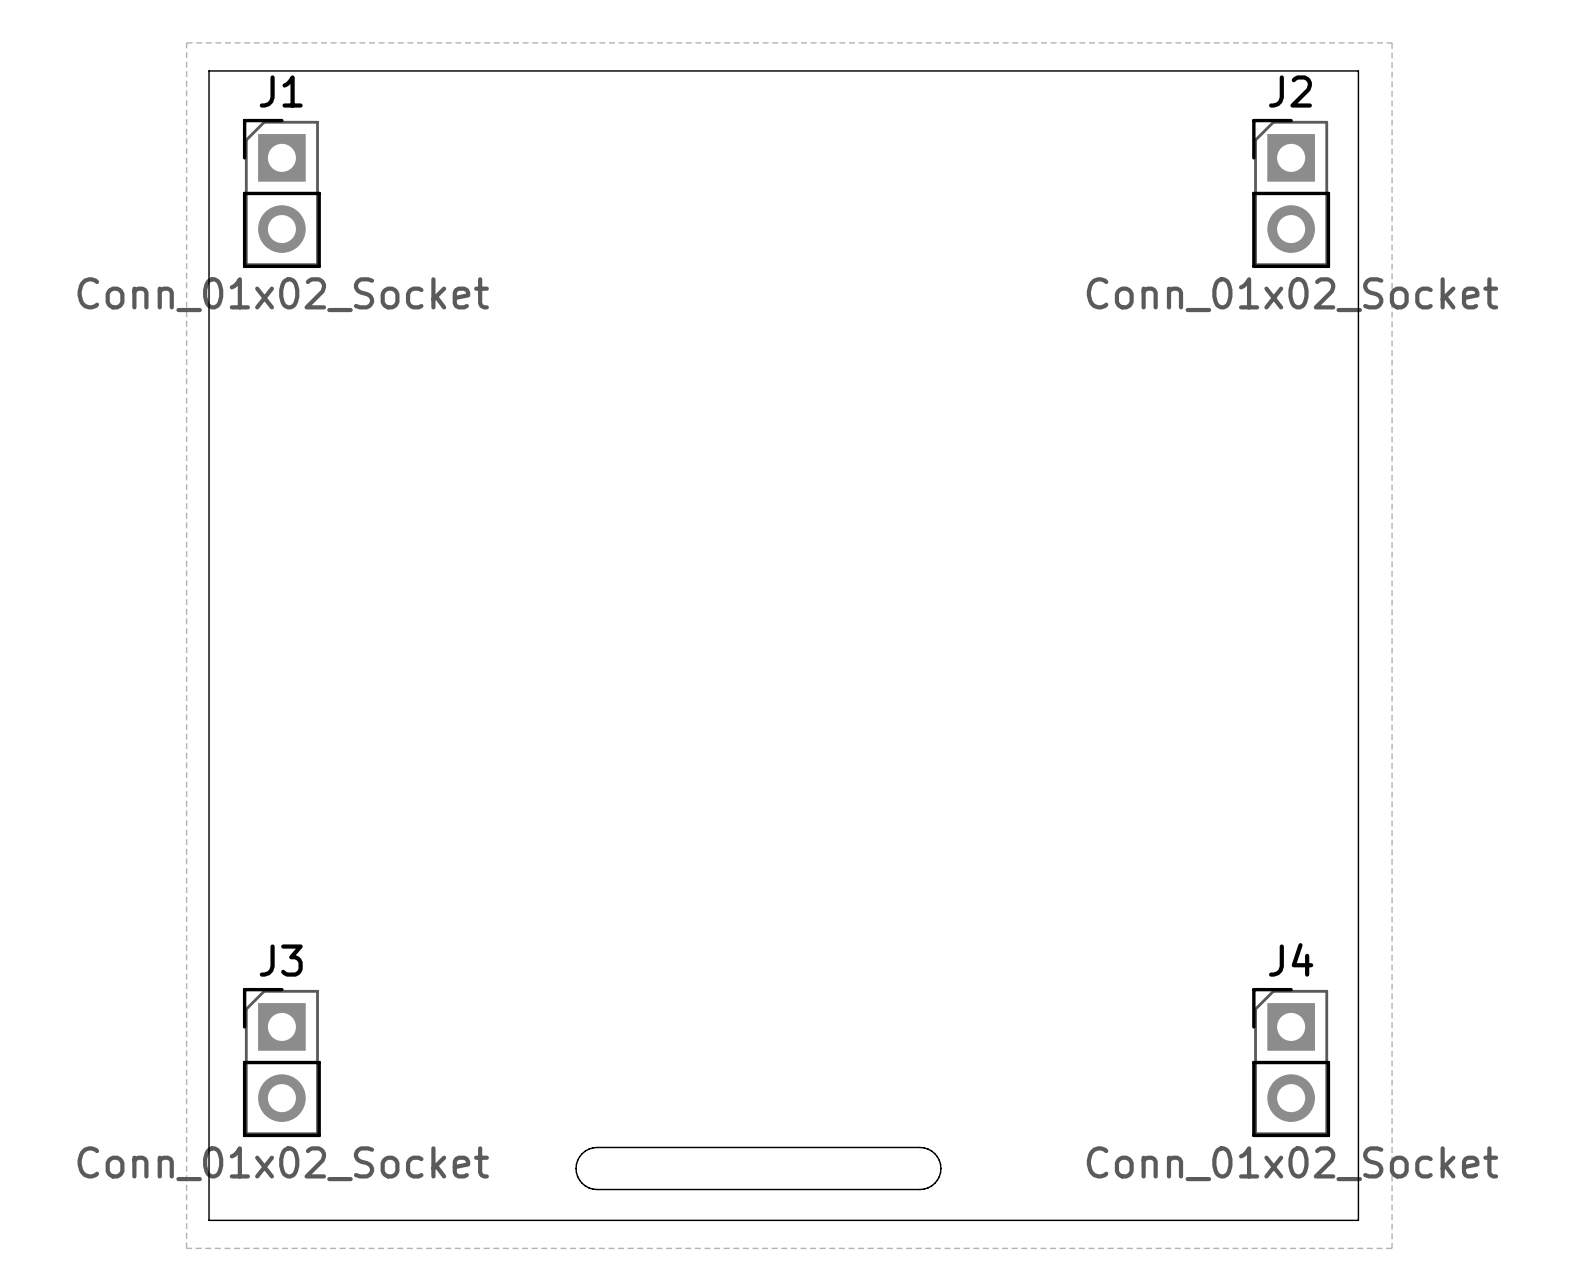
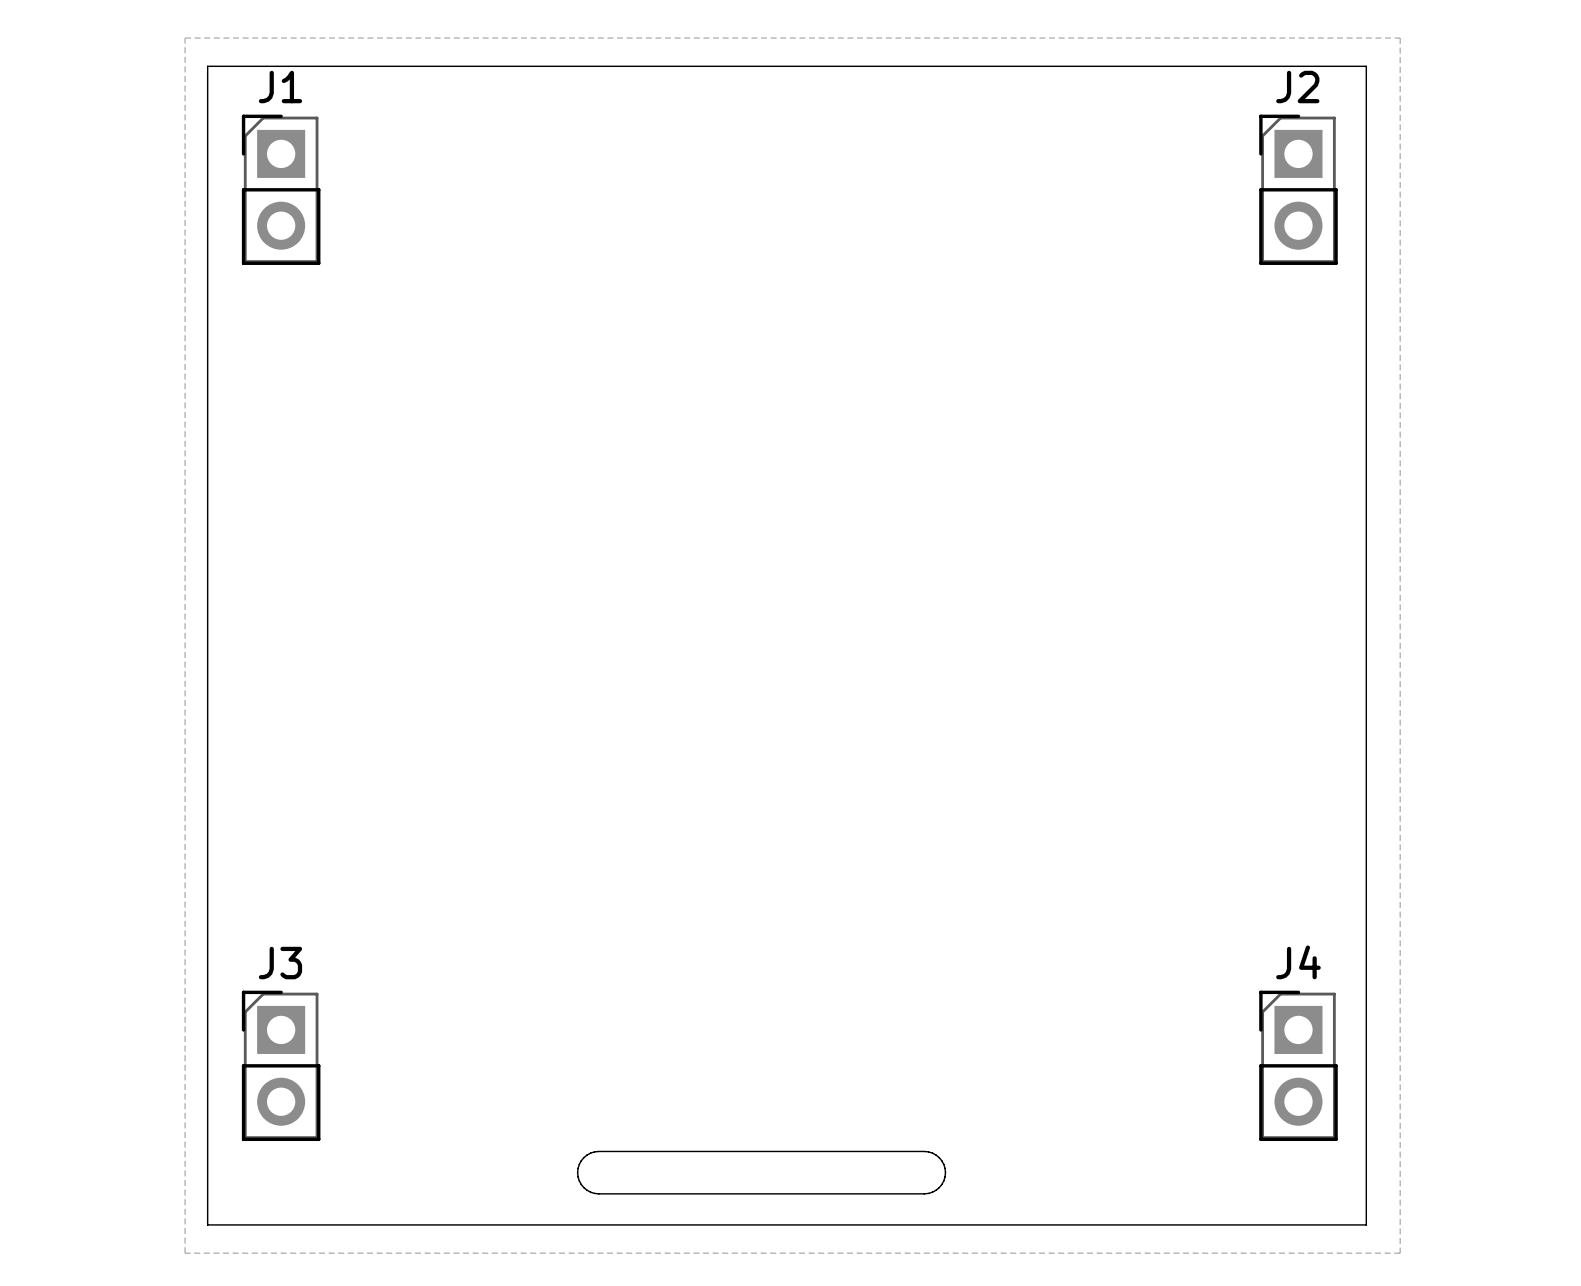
J1 value: Conn_01x02_Socket (283, 294) -> none
J2 value: Conn_01x02_Socket (1292, 294) -> none
J3 value: Conn_01x02_Socket (283, 1163) -> none
J4 value: Conn_01x02_Socket (1292, 1163) -> none

